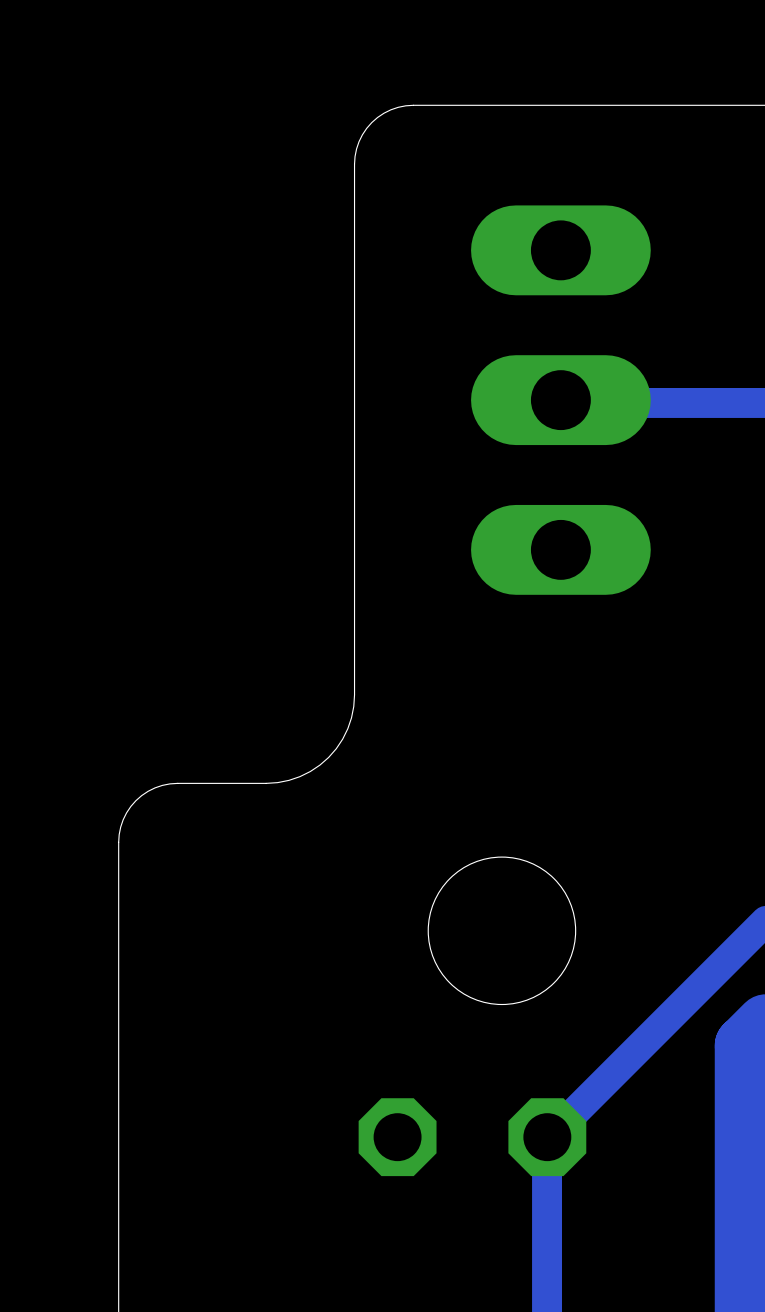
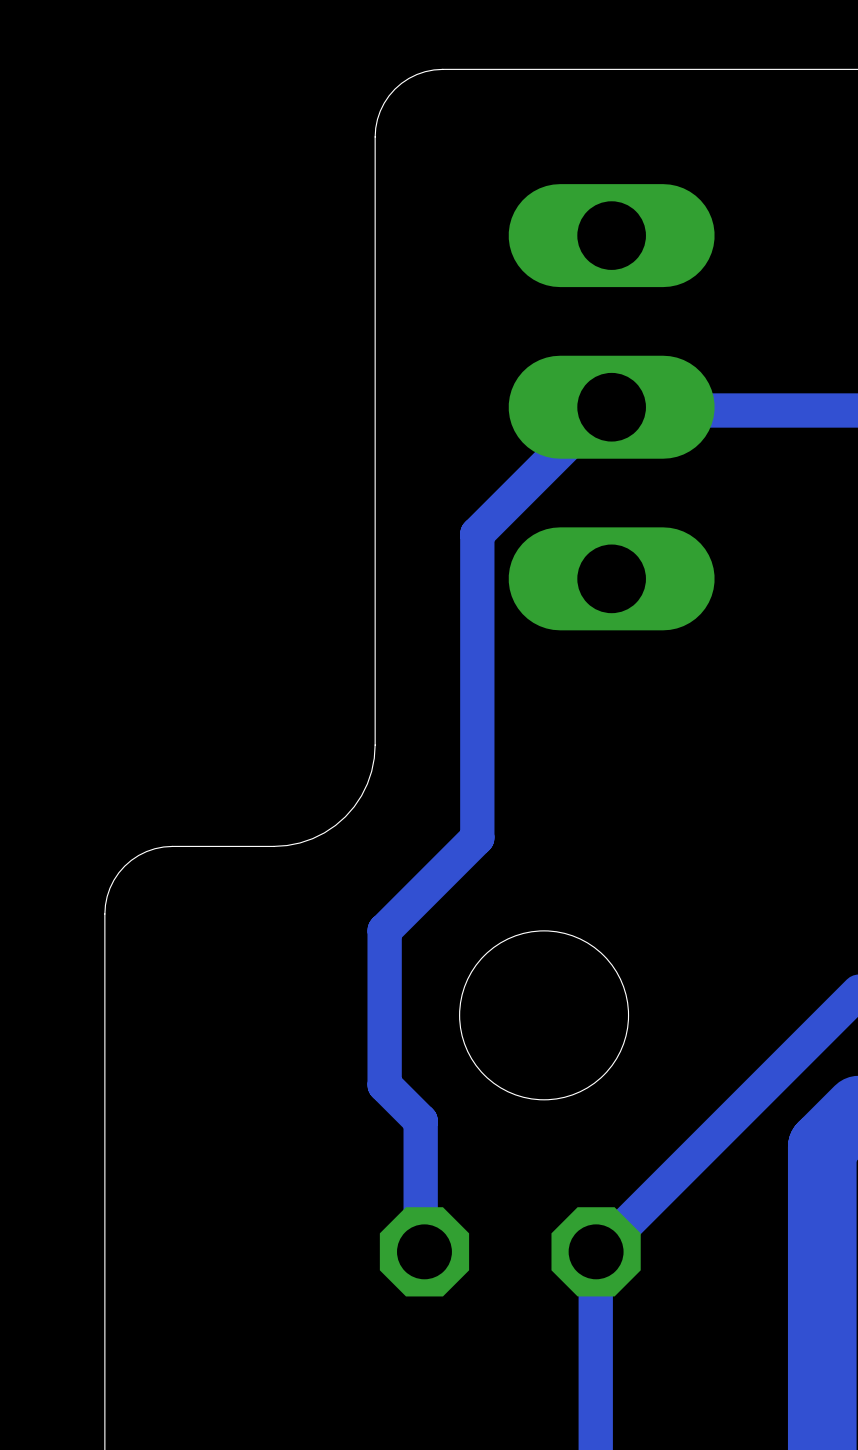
track: none -> (611, 407) (595, 415) (477, 534) (477, 837) (384, 930) (384, 1084) (420, 1121) (420, 1249) (424, 1251)

